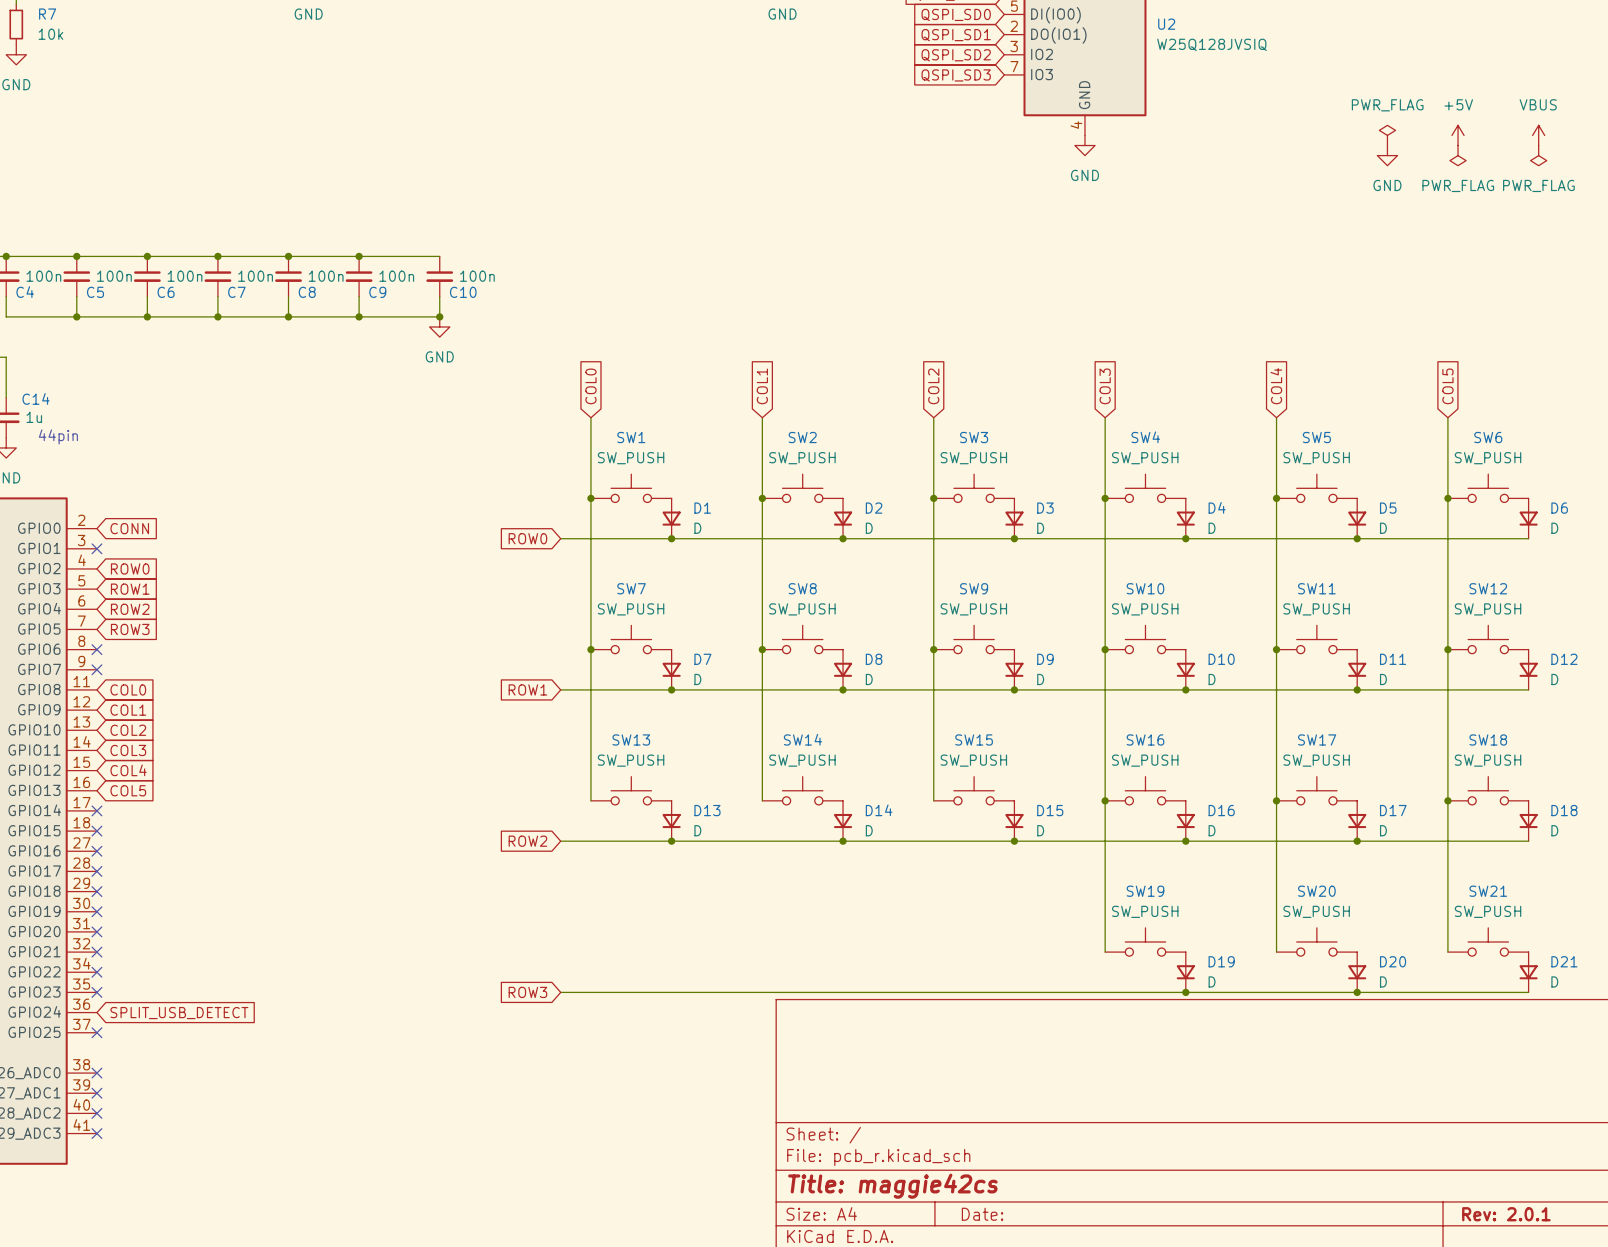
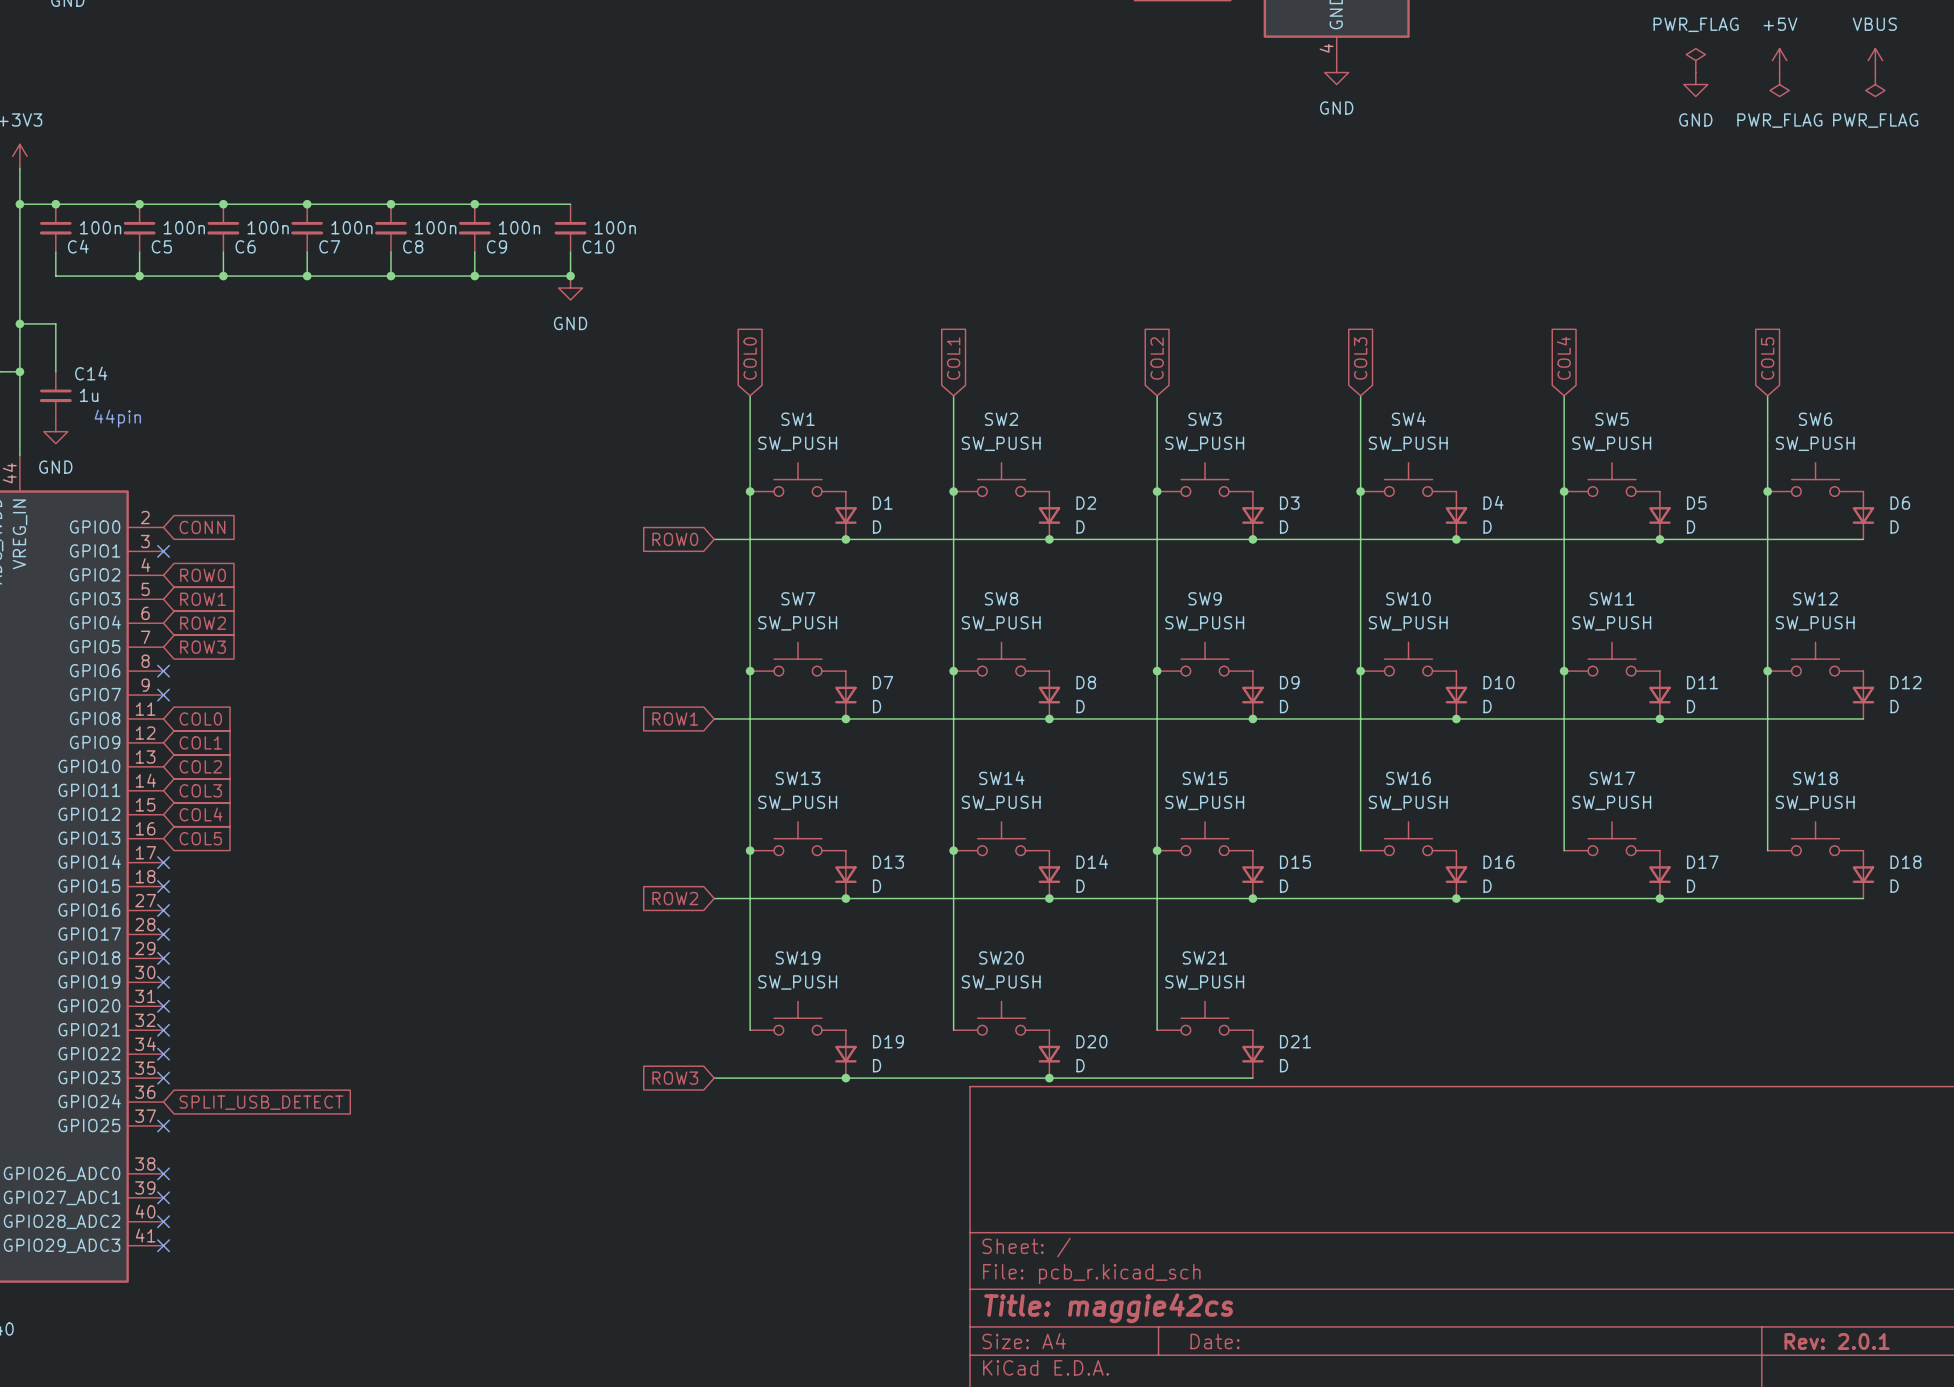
wire: none -> (750, 850) (750, 1030)
junction: none -> (750, 850)
wire: none -> (953, 850) (953, 1030)
junction: none -> (953, 850)
junction: none -> (1157, 850)
wire: (1105, 800) (1105, 952) -> (1157, 850) (1157, 1030)
junction: (1105, 800) -> none
wire: (1276, 800) (1276, 952) -> none
junction: (1276, 800) -> none
wire: (1447, 800) (1447, 952) -> none
junction: (1447, 800) -> none
SW19 position: (1145, 942) -> (798, 1018)
SW20 position: (1316, 942) -> (1001, 1018)
SW21 position: (1488, 942) -> (1205, 1018)
D19 position: (1185, 972) -> (845, 1054)
D20 position: (1357, 972) -> (1049, 1054)
D21 position: (1528, 972) -> (1252, 1054)
junction: none -> (845, 1078)
junction: none -> (1049, 1078)
wire: (1014, 992) (1528, 992) -> none
junction: (1185, 992) -> none
junction: (1357, 992) -> none

